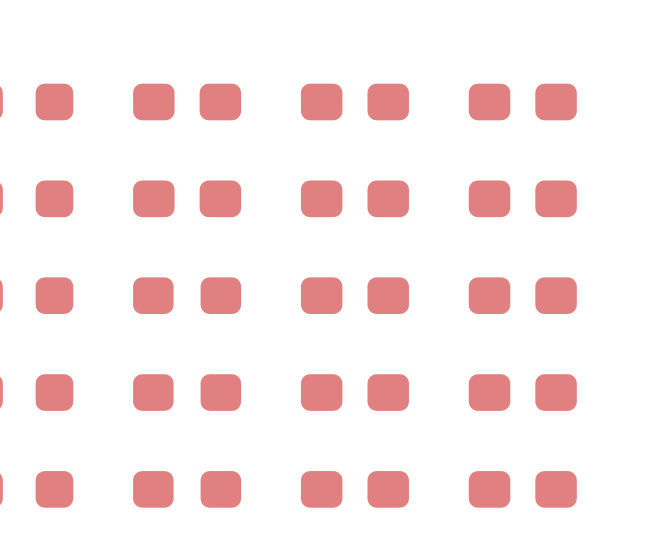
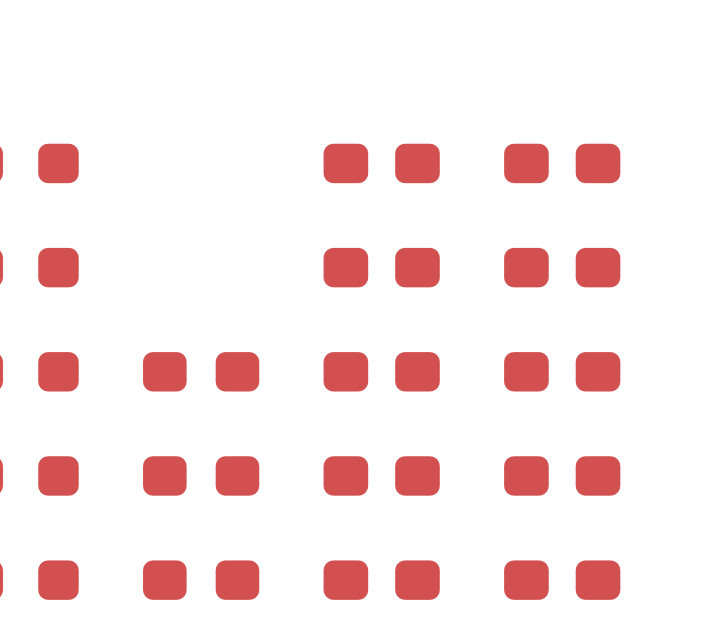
part: (187, 101) -> none
part: (187, 198) -> none

